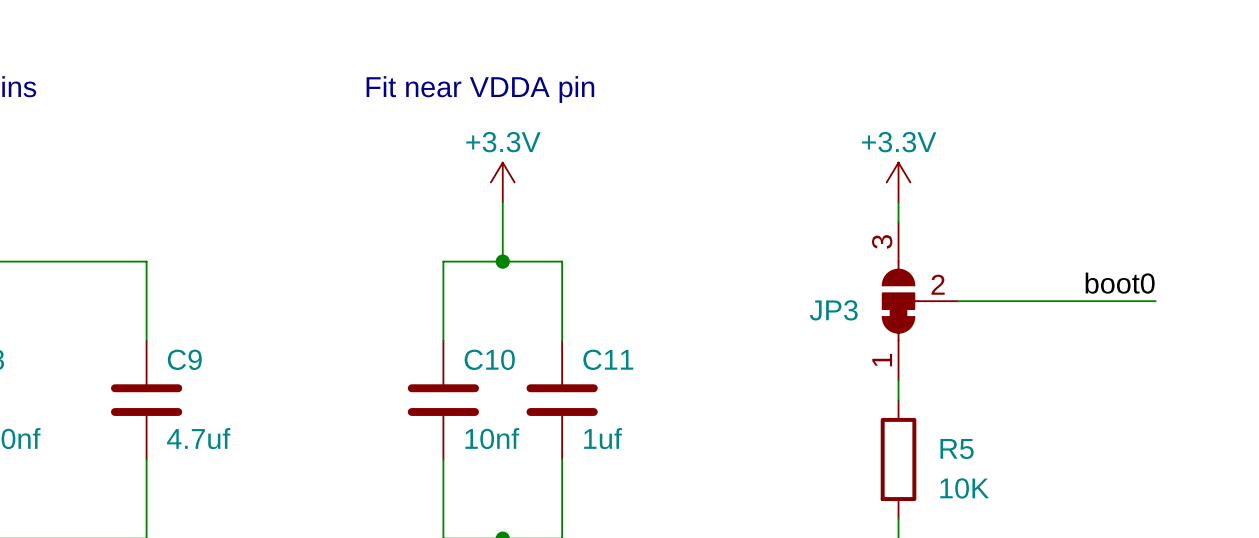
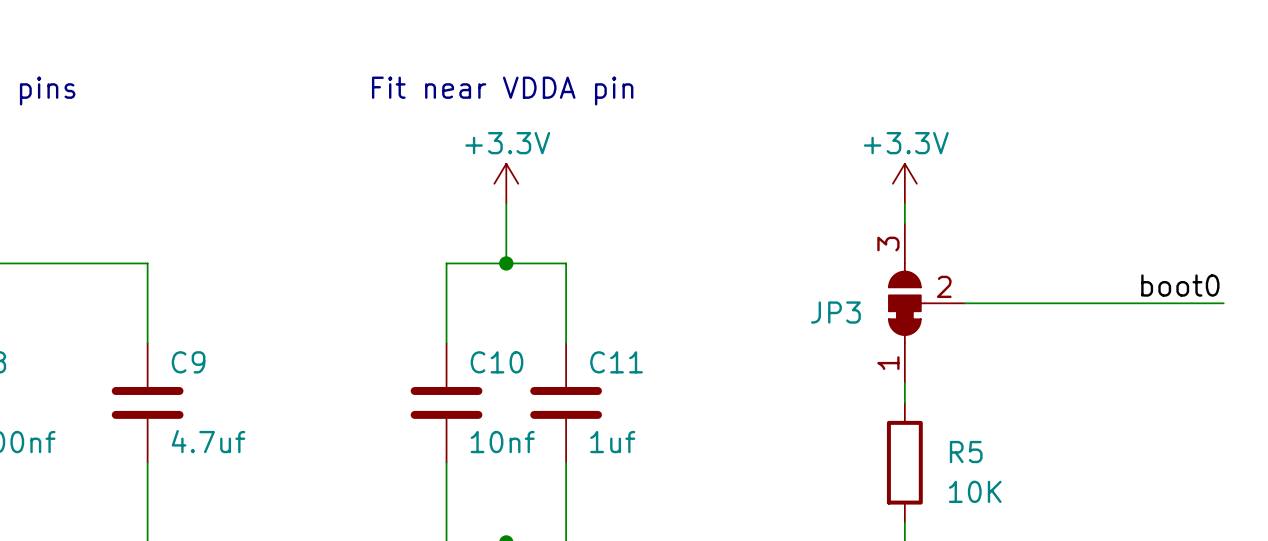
label position: boot0 (1120, 283) -> boot0 (1180, 285)
wire: none -> (1163, 303) (1223, 303)

